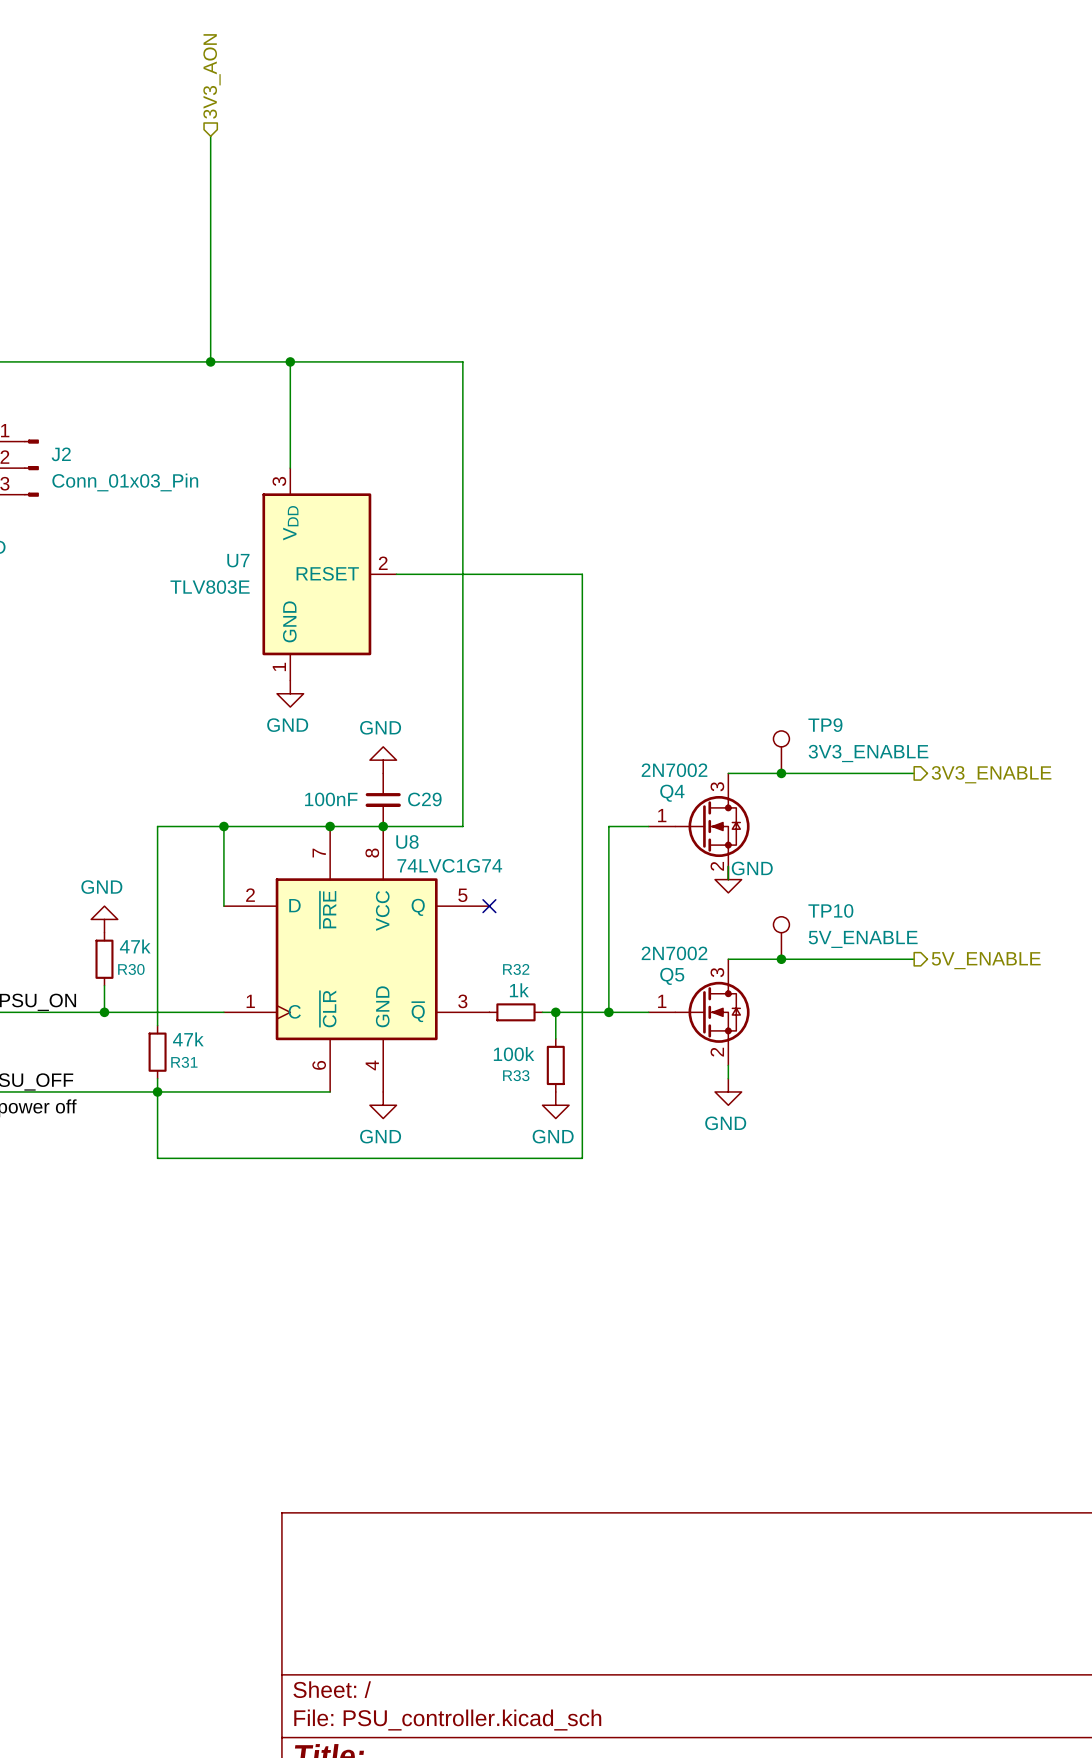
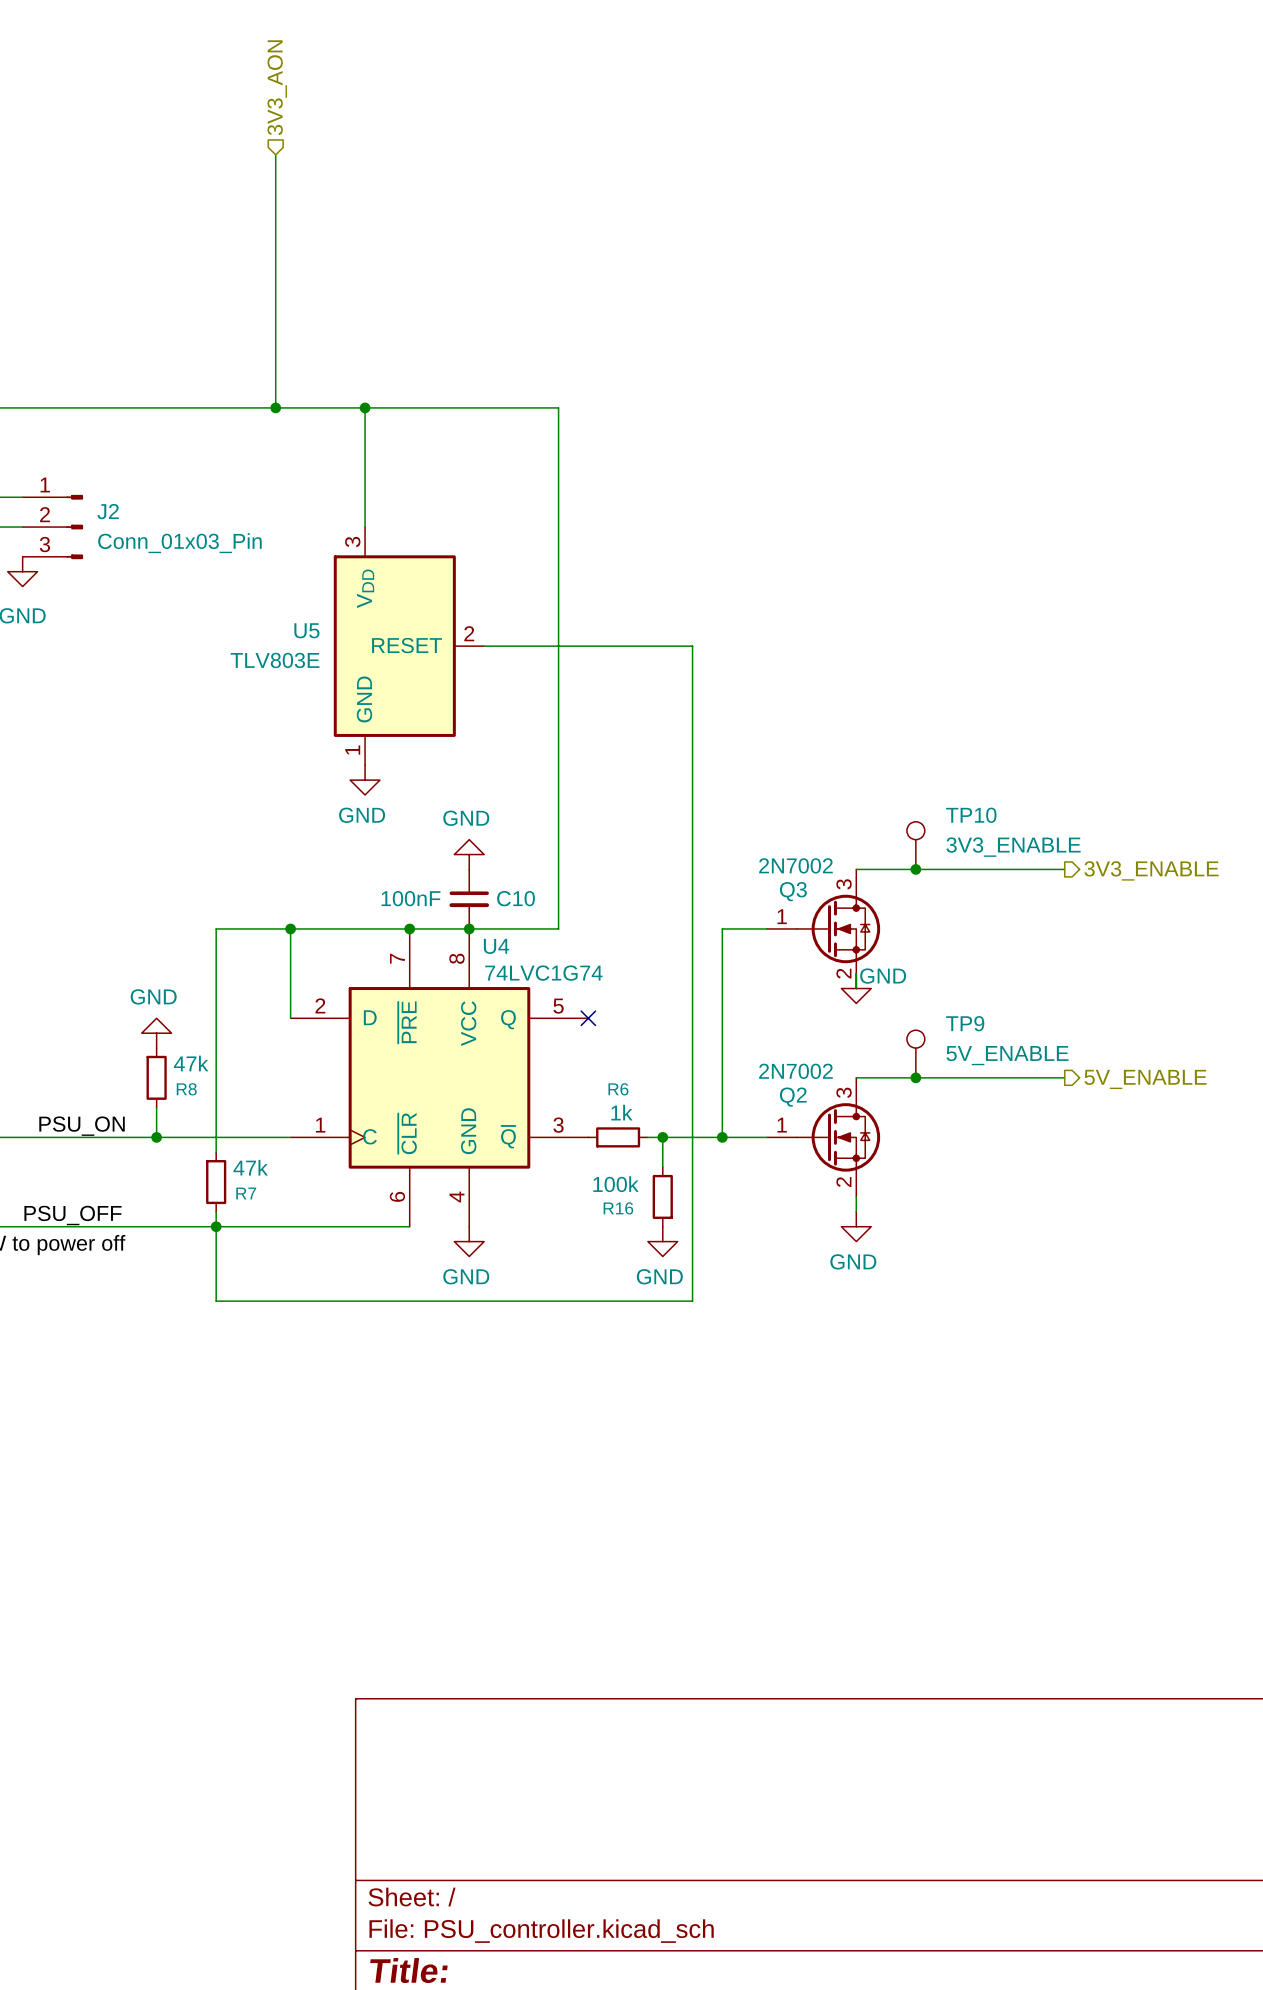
U7 name: U7 (238, 560) -> U5 (306, 630)
TP9 name: TP9 (825, 725) -> TP10 (971, 815)
Q4 name: Q4 (672, 793) -> Q3 (793, 891)
C29 name: C29 (424, 799) -> C10 (516, 898)
U8 name: U8 (407, 841) -> U4 (496, 946)
TP10 name: TP10 (830, 910) -> TP9 (965, 1023)
R30 name: R30 (131, 969) -> R8 (186, 1089)
R32 name: R32 (516, 969) -> R6 (618, 1089)
Q5 name: Q5 (672, 976) -> Q2 (793, 1097)
R31 name: R31 (184, 1062) -> R7 (246, 1193)
R33 name: R33 (516, 1075) -> R16 (618, 1208)

